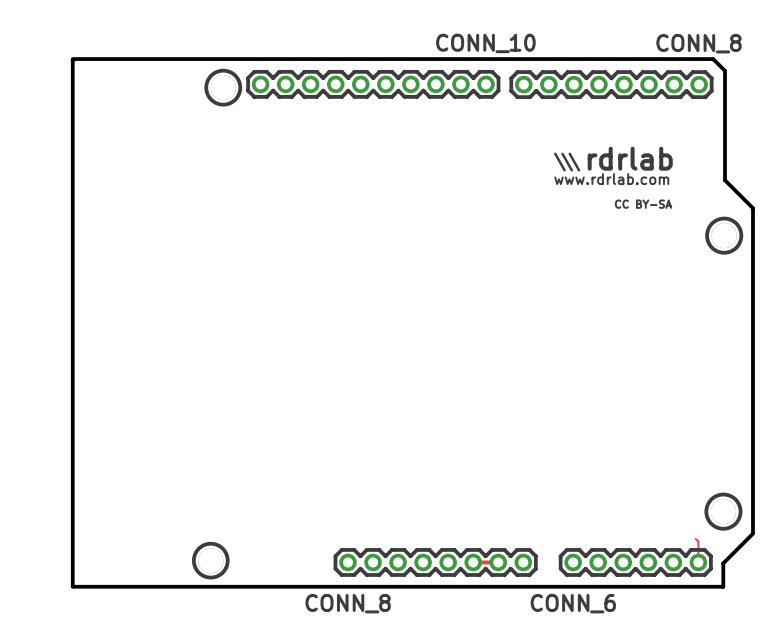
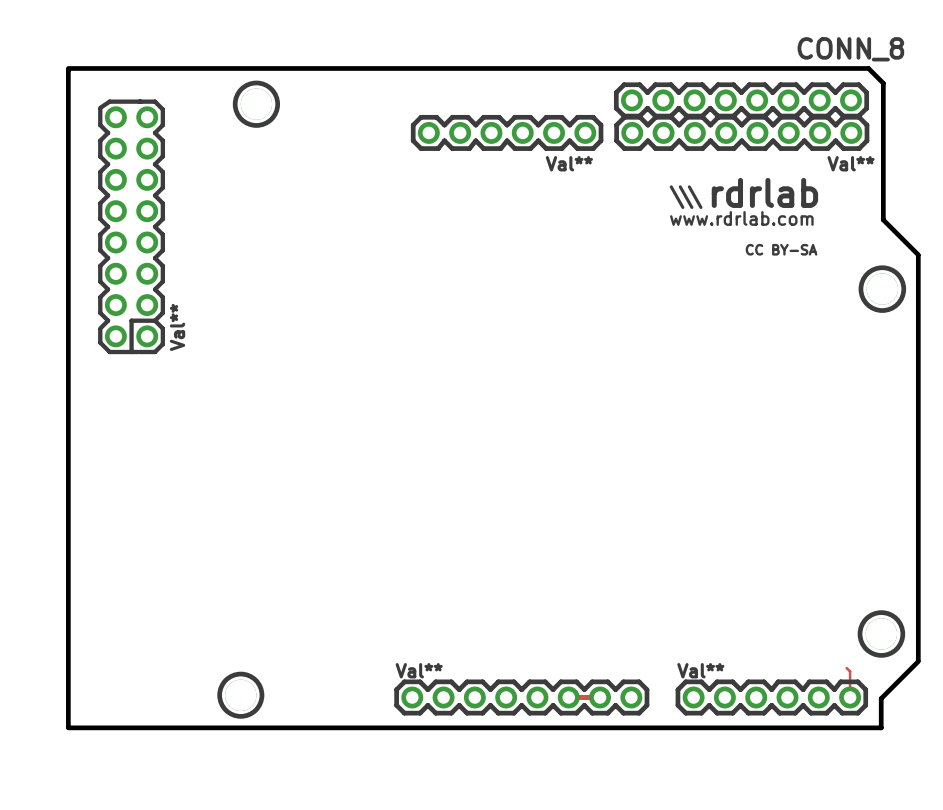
part: CONN_10 (373, 84) -> none
part: none -> Val** (507, 132)
part: none -> Val** (741, 132)
part: none -> Val** (131, 226)
part value: CONN_8 (348, 603) -> Val** (419, 670)
part value: CONN_6 (573, 603) -> Val** (700, 670)

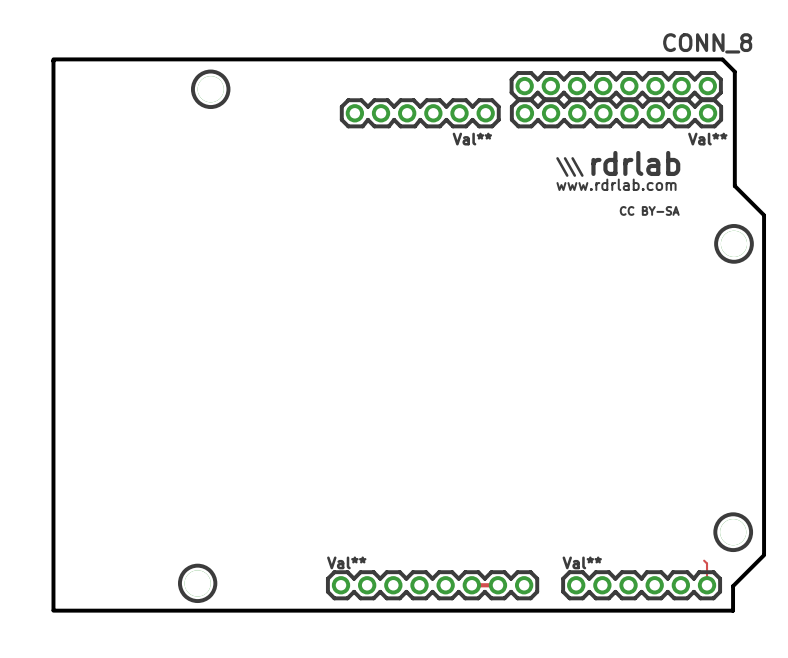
part: Val** (131, 226) -> none

